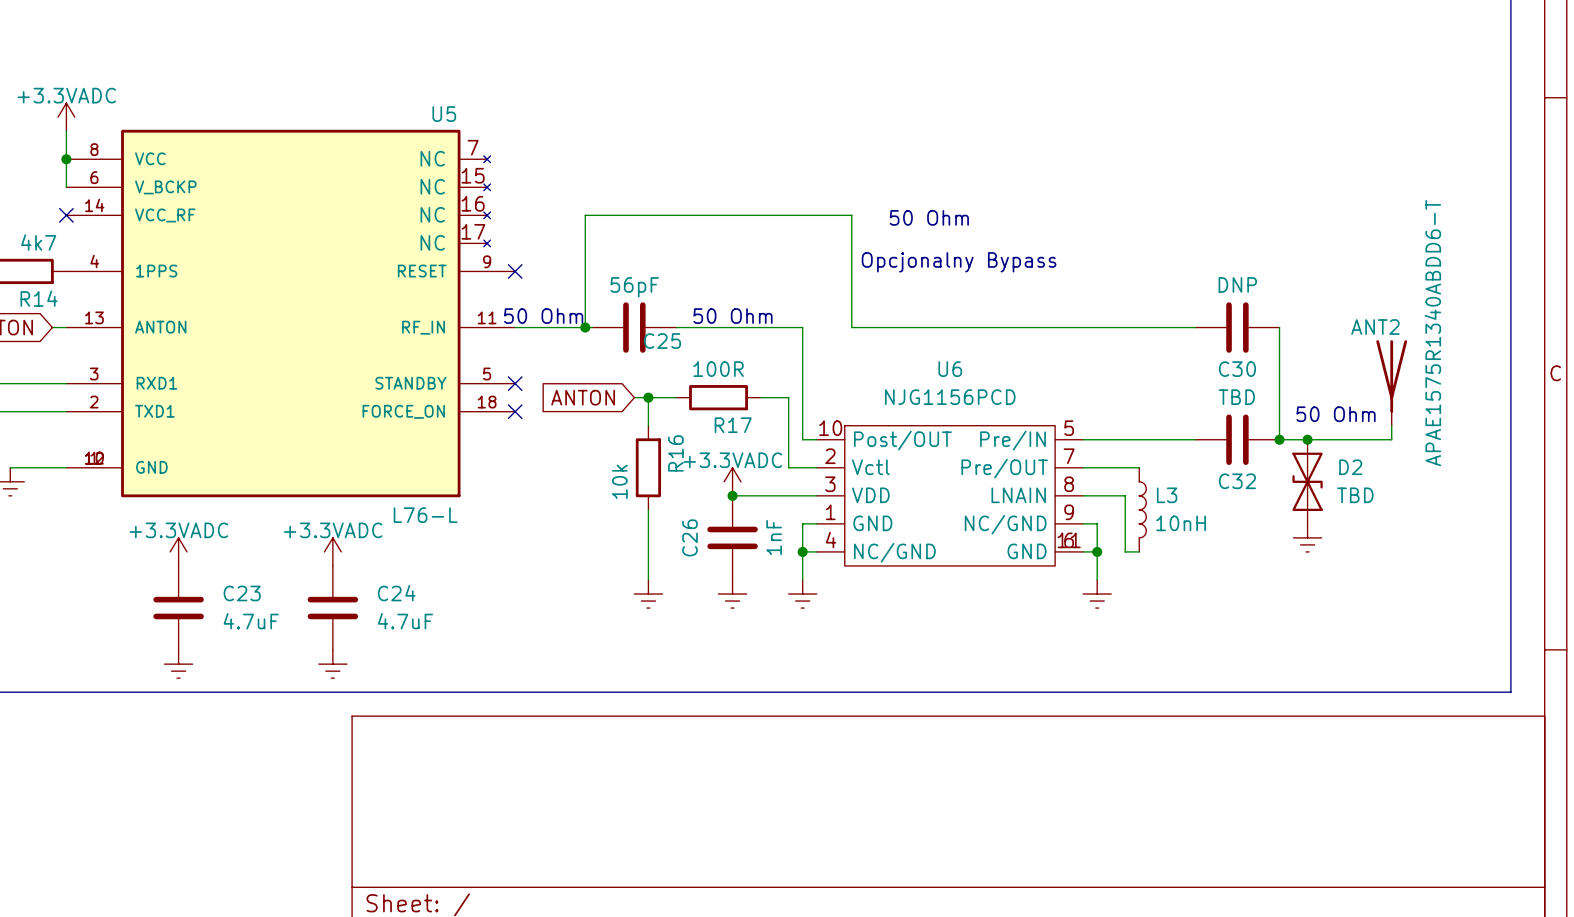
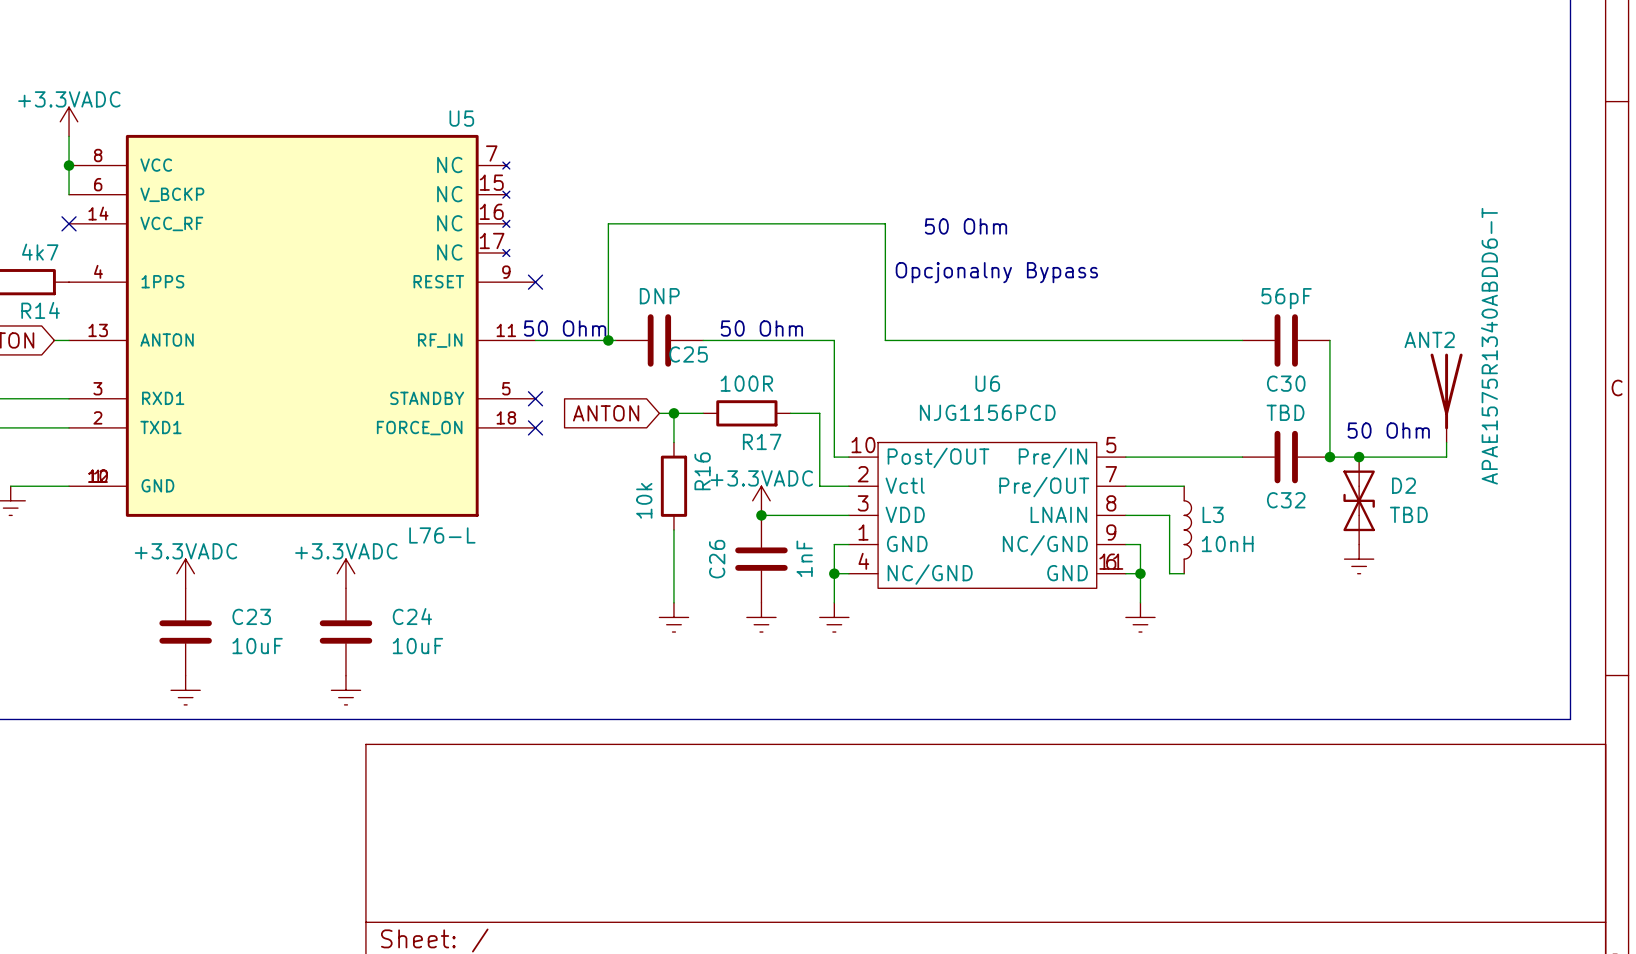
C30 value: DNP (1237, 284) -> 56pF (1286, 298)
C25 value: 56pF (634, 287) -> DNP (659, 296)
C23 value: 4.7uF (251, 621) -> 10uF (257, 646)
C24 value: 4.7uF (405, 621) -> 10uF (417, 646)

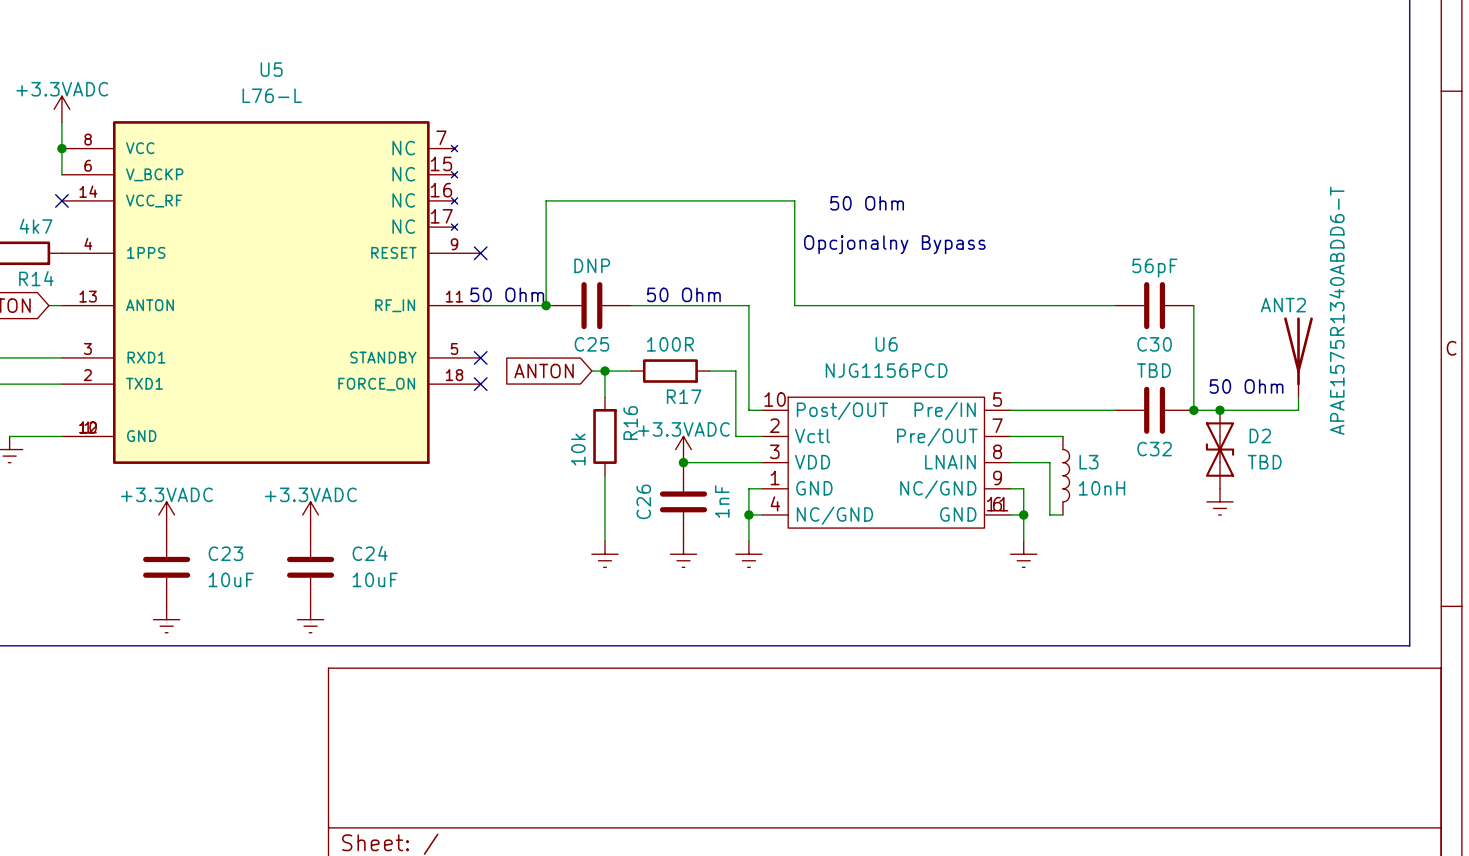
U5 name position: U5 (461, 118) -> U5 (271, 69)
C25 name position: C25 (688, 354) -> C25 (591, 344)
U5 value position: L76-L (442, 535) -> L76-L (272, 95)

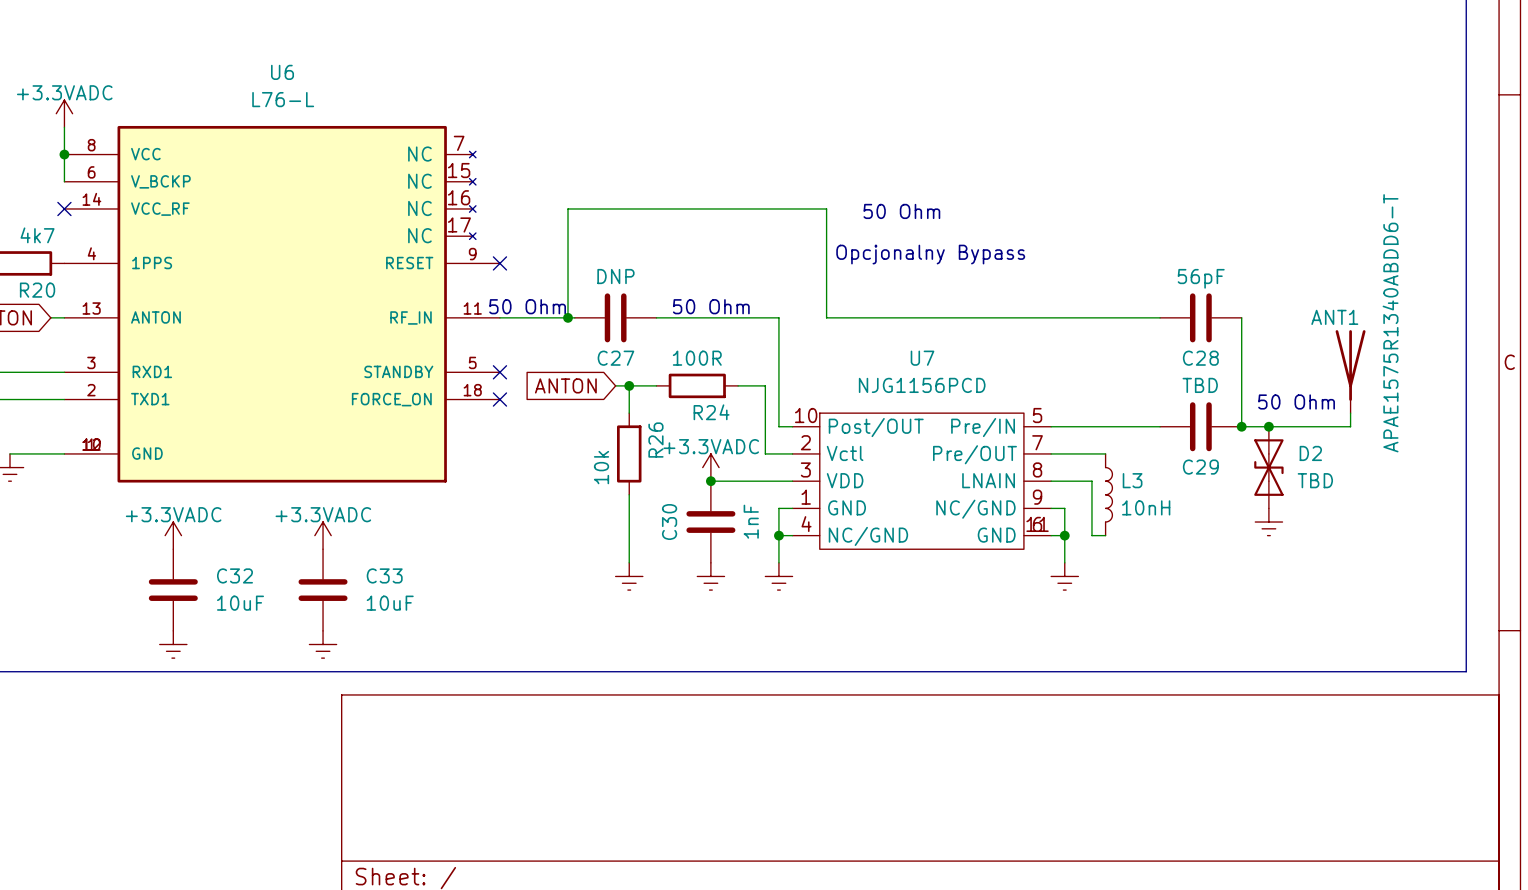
U5 name: U5 (271, 69) -> U6 (282, 72)
R14 name: R14 (36, 278) -> R20 (37, 290)
ANT2 name: ANT2 (1283, 305) -> ANT1 (1334, 317)
C25 name: C25 (591, 344) -> C27 (615, 358)
U6 name: U6 (886, 344) -> U7 (922, 358)
C30 name: C30 (1154, 344) -> C28 (1200, 358)
R17 name: R17 (684, 396) -> R24 (711, 412)
R16 name: R16 (630, 423) -> R26 (655, 440)
C32 name: C32 (1154, 449) -> C29 (1200, 467)
C26 name: C26 (643, 501) -> C30 (669, 522)
C23 name: C23 (225, 553) -> C32 (234, 575)
C24 name: C24 (370, 553) -> C33 (384, 575)

